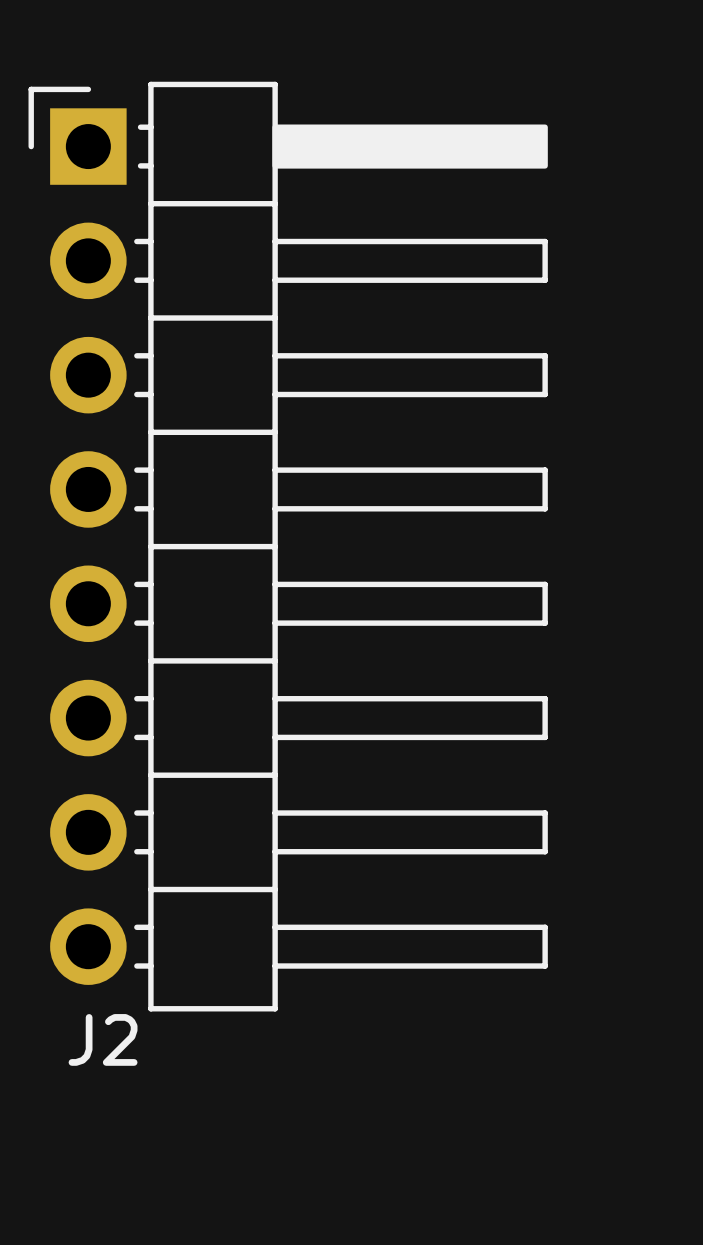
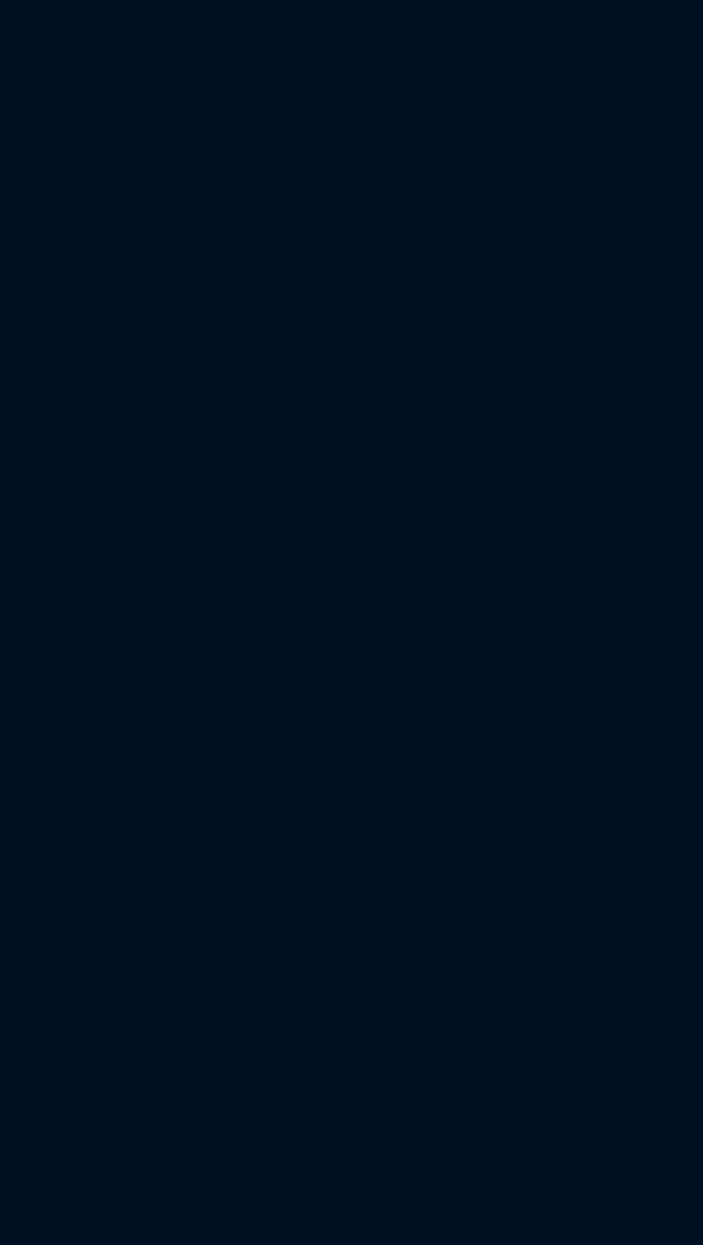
J2: (288, 546) -> none

